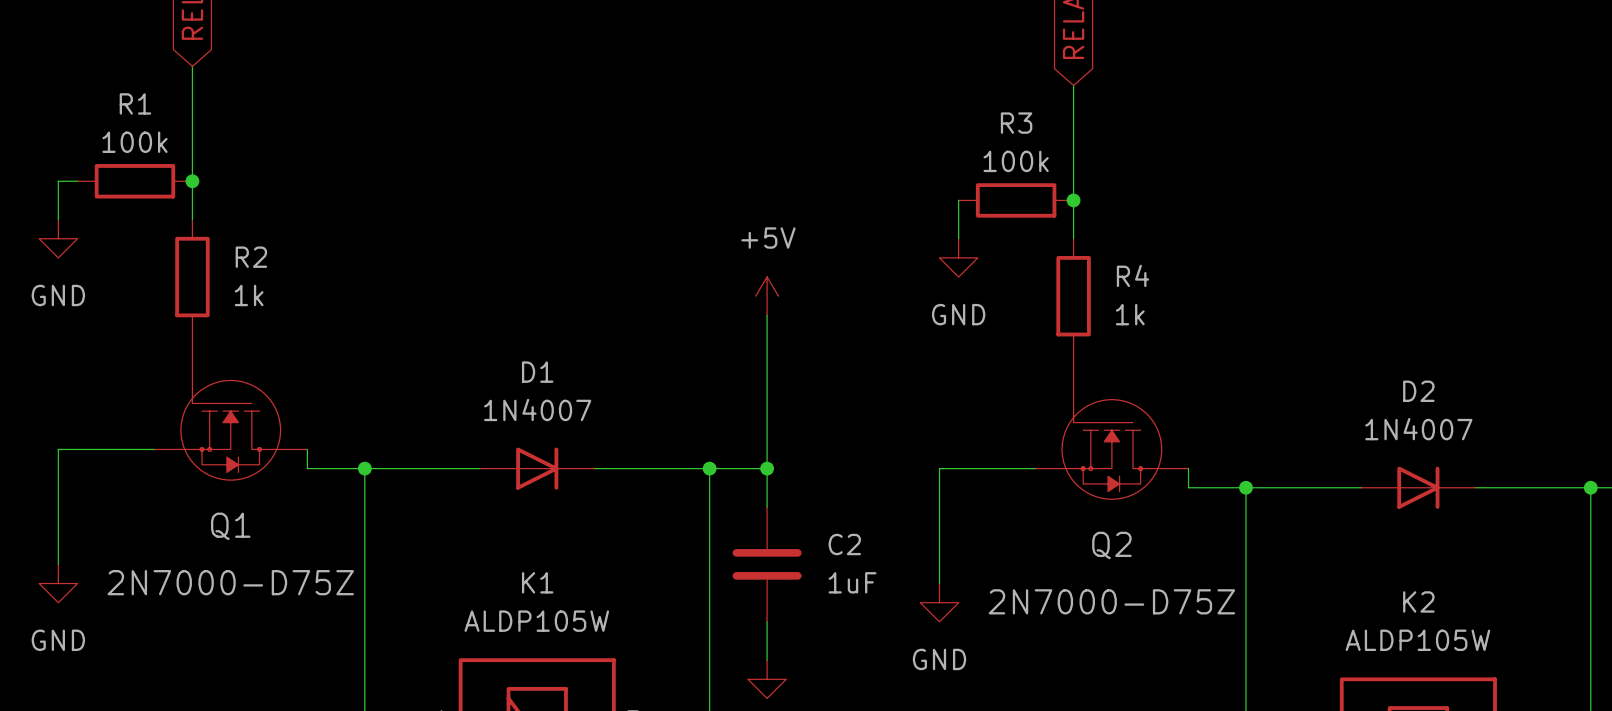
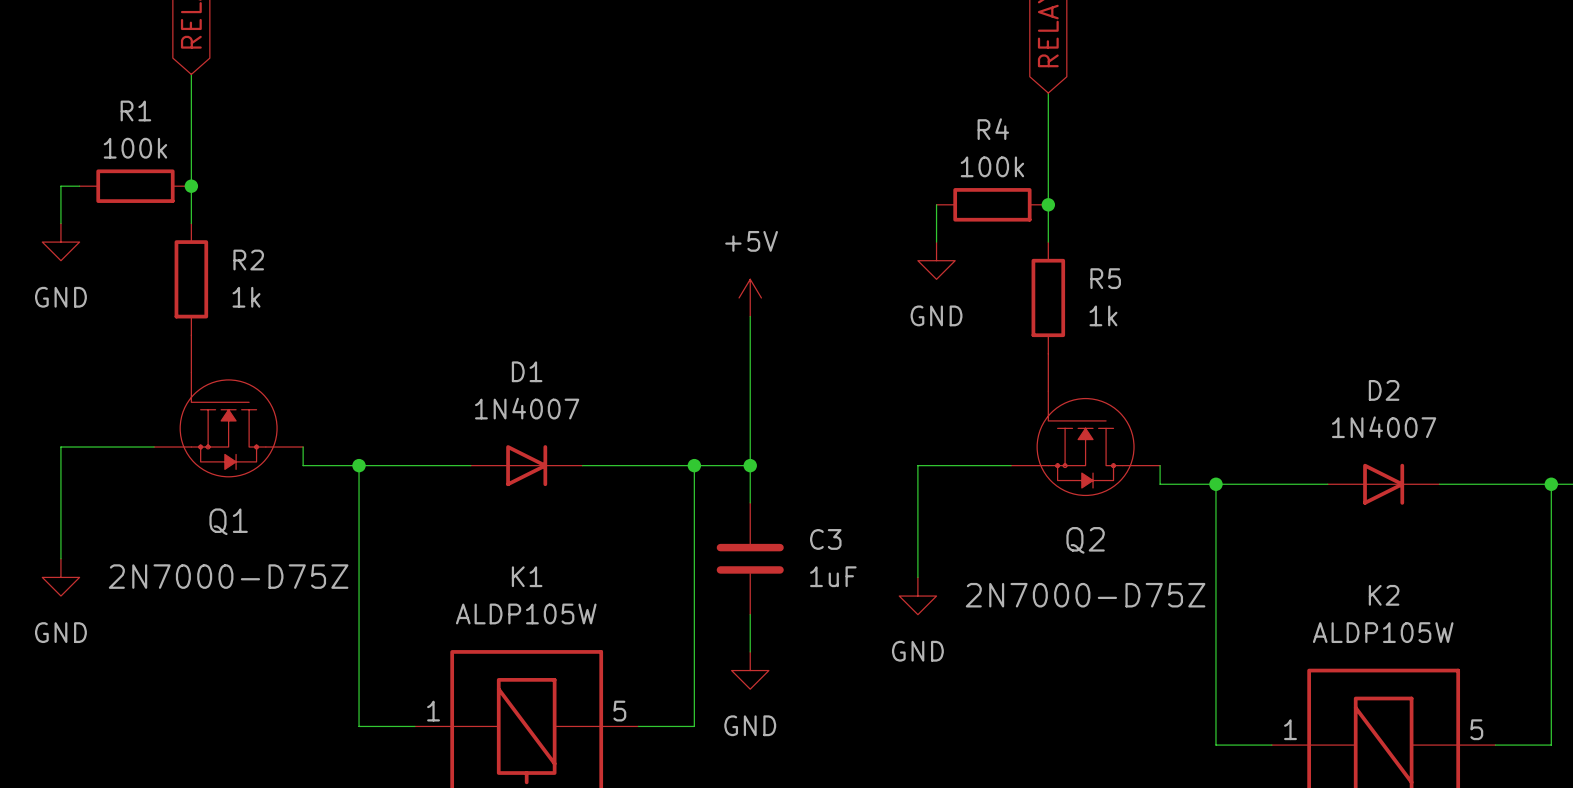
R3 name: R3 (1016, 123) -> R4 (993, 129)
R4 name: R4 (1133, 275) -> R5 (1105, 278)
C2 name: C2 (844, 544) -> C3 (825, 539)

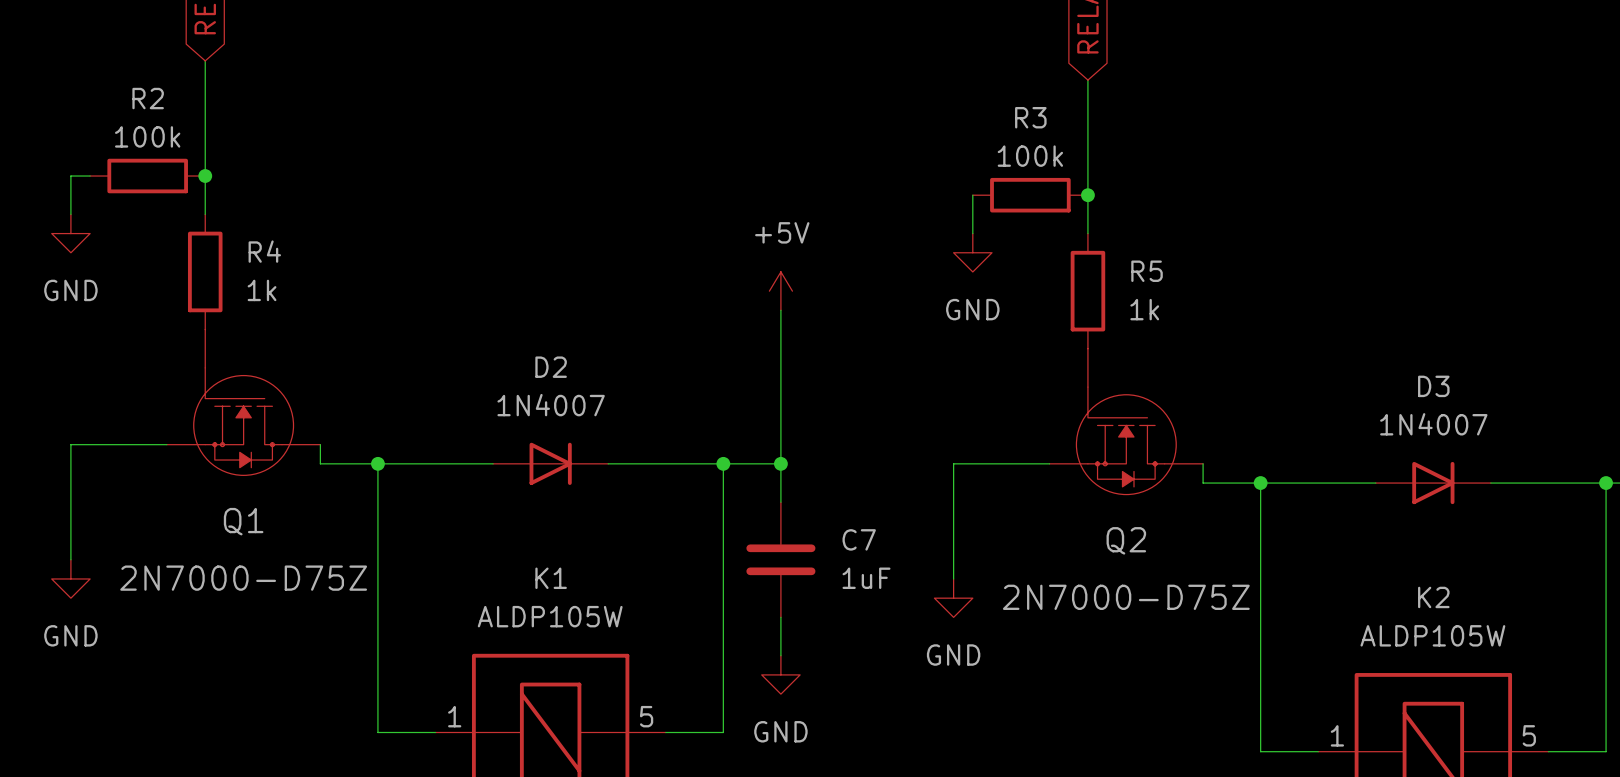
R1 name: R1 (135, 110) -> R2 (148, 98)
R4 name: R4 (993, 129) -> R3 (1030, 117)
R2 name: R2 (248, 260) -> R4 (264, 251)
D1 name: D1 (527, 371) -> D2 (551, 367)
D2 name: D2 (1384, 390) -> D3 (1433, 386)
C3 name: C3 (825, 539) -> C7 (859, 539)

